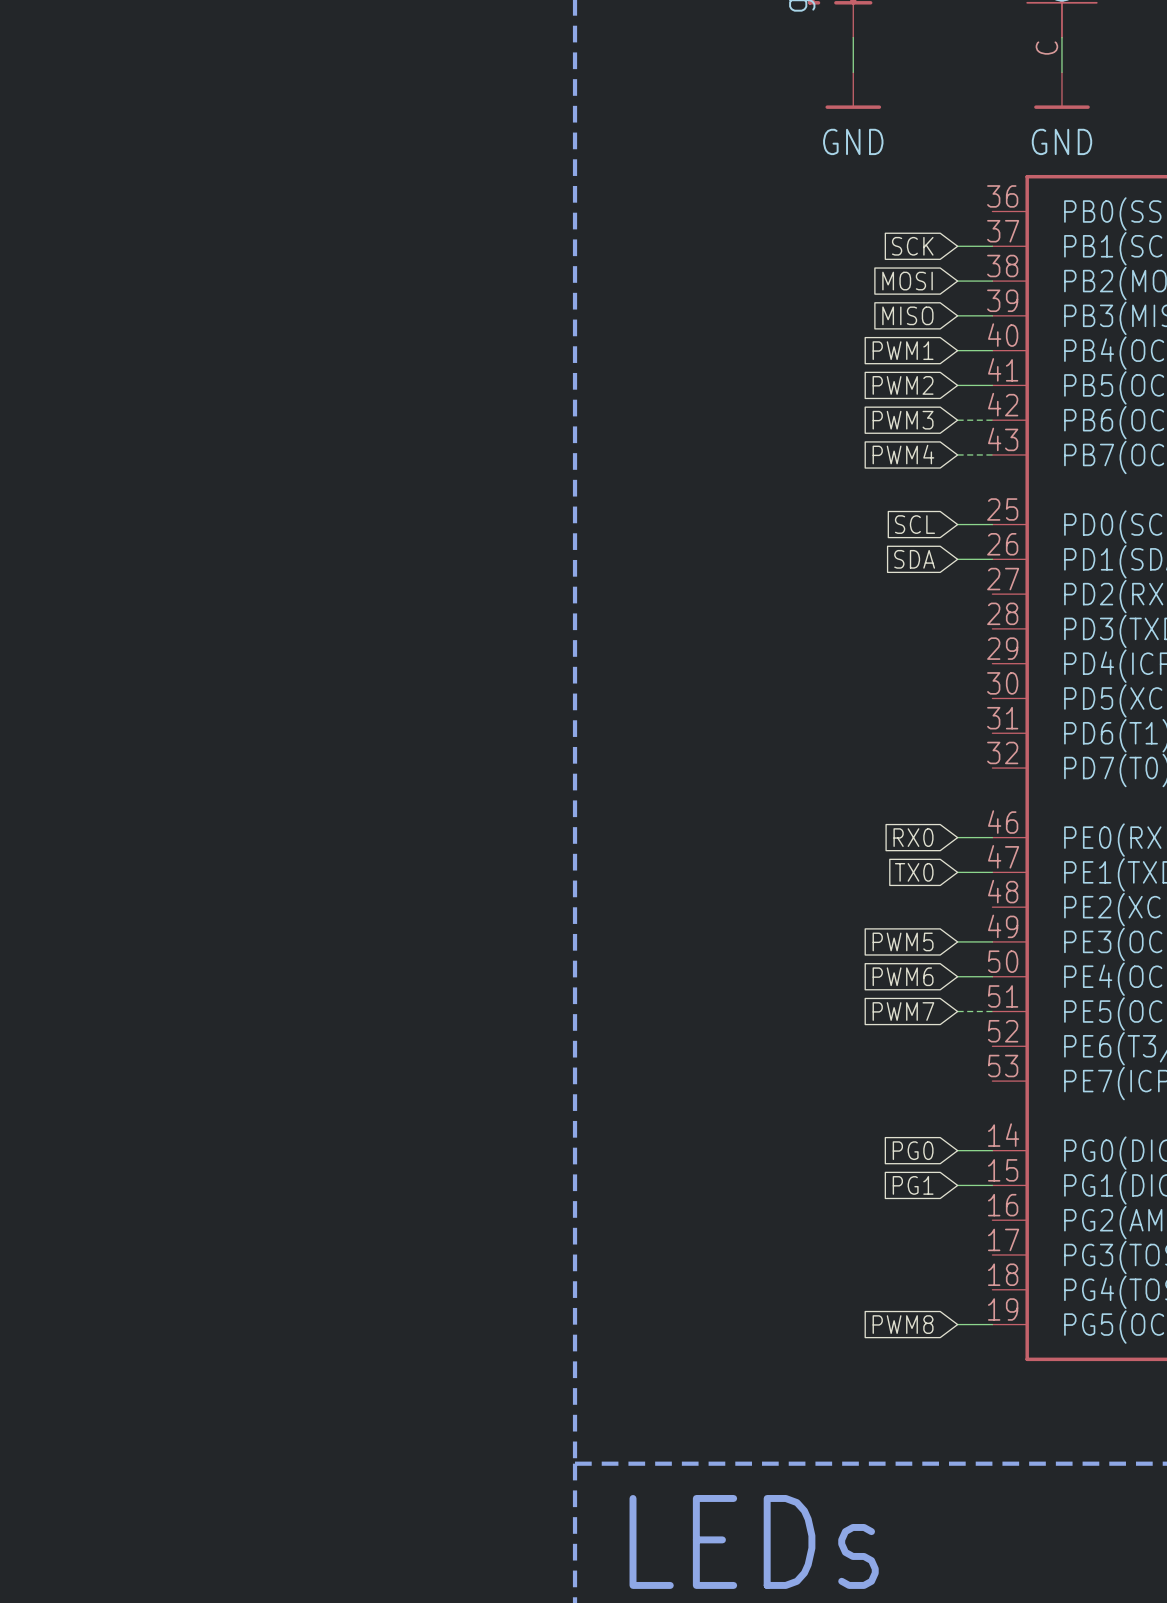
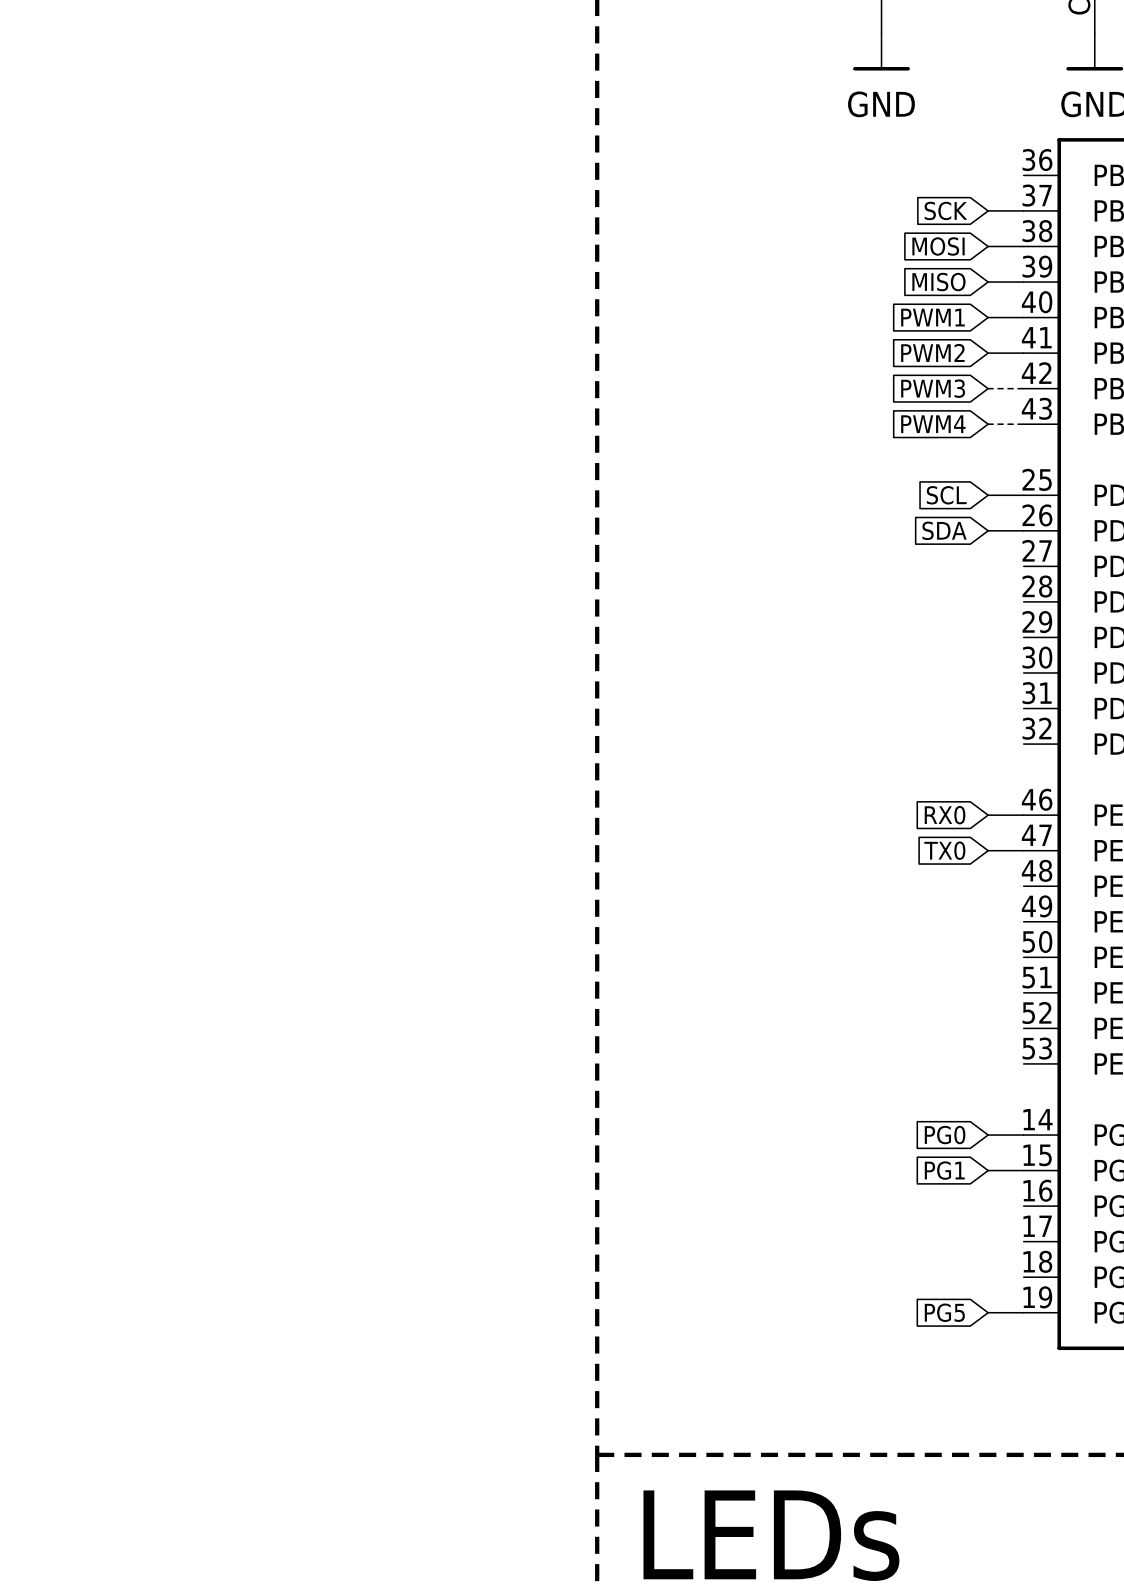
global label: PWM5 (903, 941) -> none
wire: (957, 941) (992, 941) -> none
global label: PWM6 (903, 976) -> none
wire: (957, 976) (992, 976) -> none
global label: PWM7 (903, 1011) -> none
wire: (957, 1011) (992, 1011) -> none
global label: PWM8 (903, 1324) -> PG5 (944, 1312)

